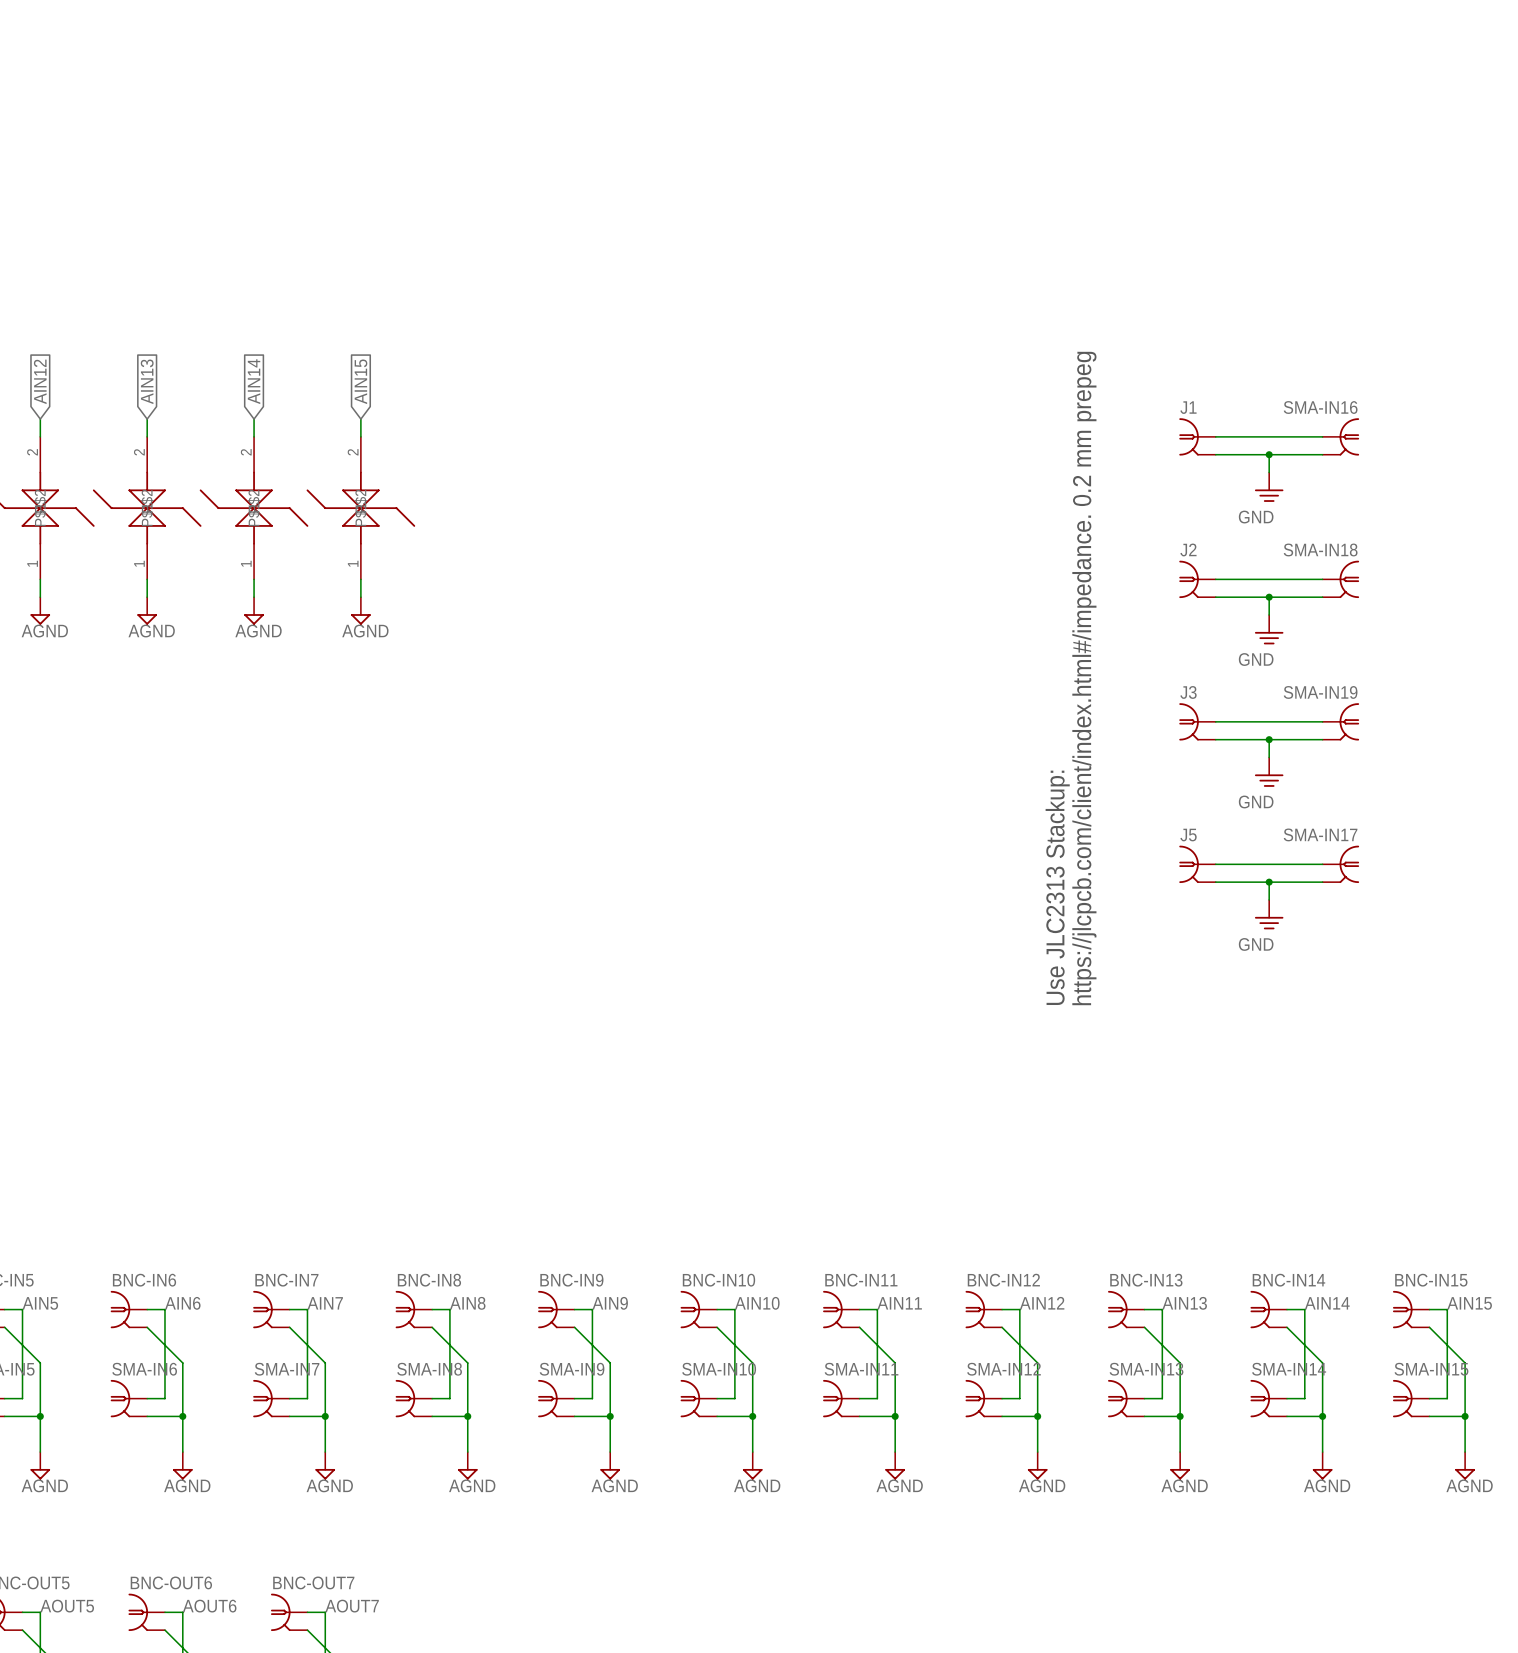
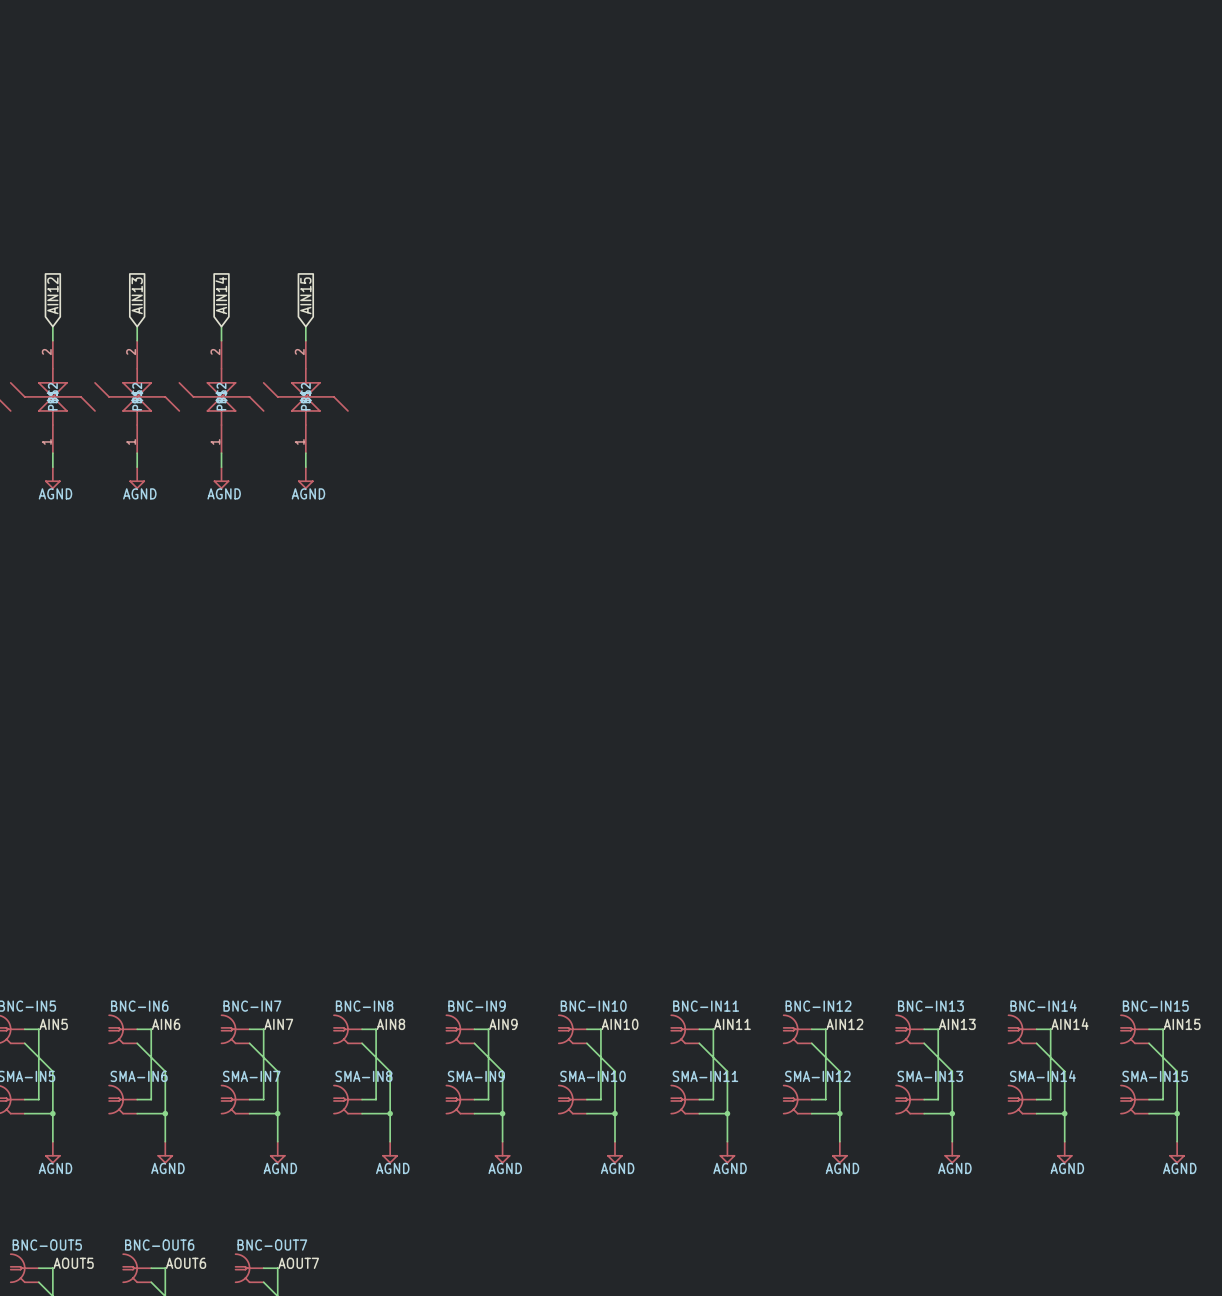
J1: (1197, 436) -> none
wire: (1215, 436) (1322, 436) -> none
SMA-IN16: (1340, 436) -> none
wire: (1215, 454) (1322, 454) -> none
wire: (1269, 454) (1269, 472) -> none
junction: (1269, 454) -> none
power symbol: GND (1269, 487) -> none
J2: (1197, 579) -> none
wire: (1215, 579) (1322, 579) -> none
SMA-IN18: (1340, 579) -> none
wire: (1215, 597) (1322, 597) -> none
wire: (1269, 597) (1269, 615) -> none
junction: (1269, 597) -> none
power symbol: GND (1269, 629) -> none
text: https://jlcpcb.com/client/index.html#/impedance. 0.2 mm prepeg (1084, 678) -> none
J3: (1197, 721) -> none
wire: (1215, 721) (1322, 721) -> none
SMA-IN19: (1340, 721) -> none
wire: (1215, 739) (1322, 739) -> none
wire: (1269, 739) (1269, 757) -> none
junction: (1269, 739) -> none
power symbol: GND (1269, 772) -> none
J5: (1197, 864) -> none
wire: (1215, 864) (1322, 864) -> none
SMA-IN17: (1340, 864) -> none
wire: (1215, 882) (1322, 882) -> none
wire: (1269, 882) (1269, 899) -> none
junction: (1269, 882) -> none
text: Use JLC2313 Stackup: (1057, 887) -> none
power symbol: GND (1269, 914) -> none

